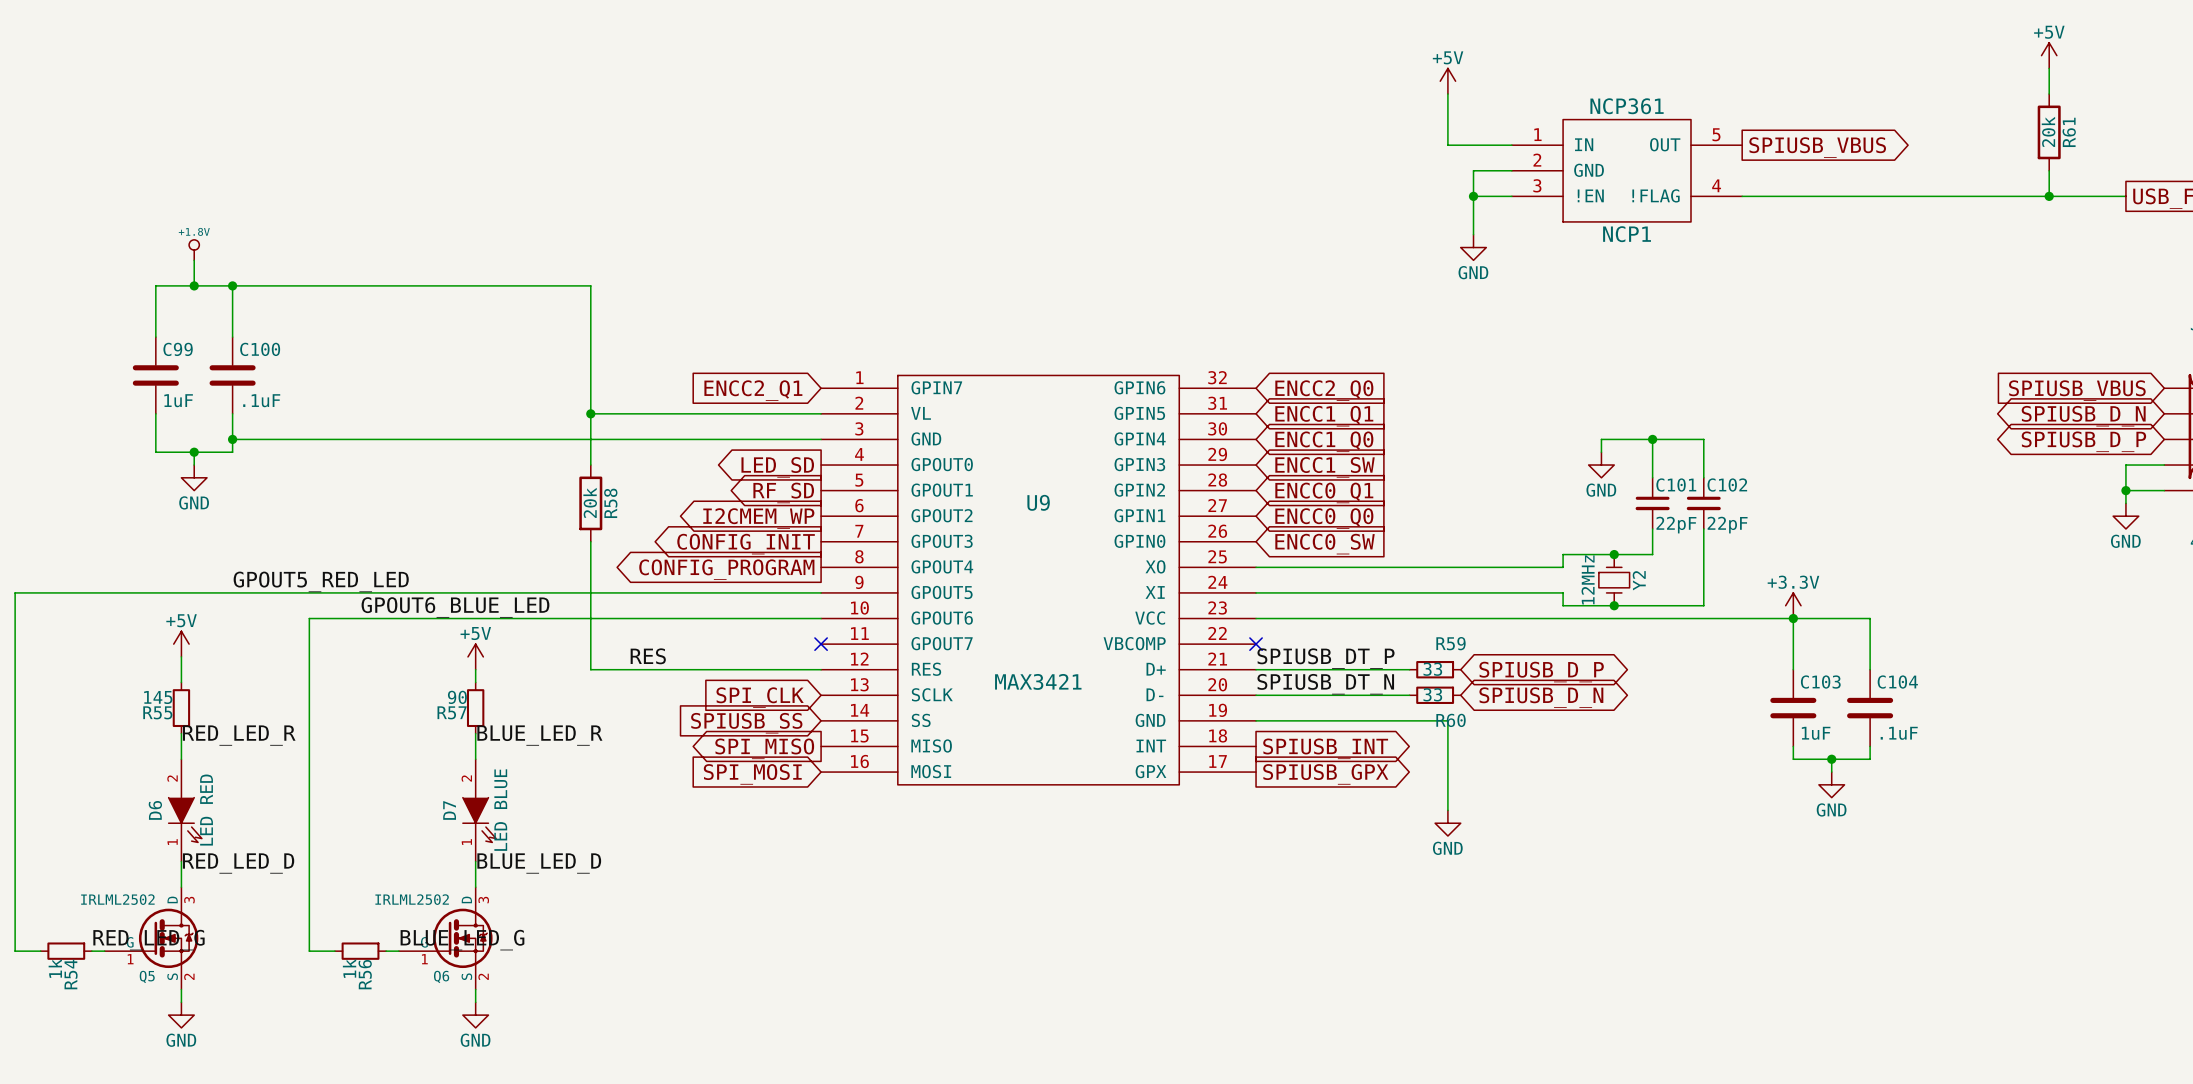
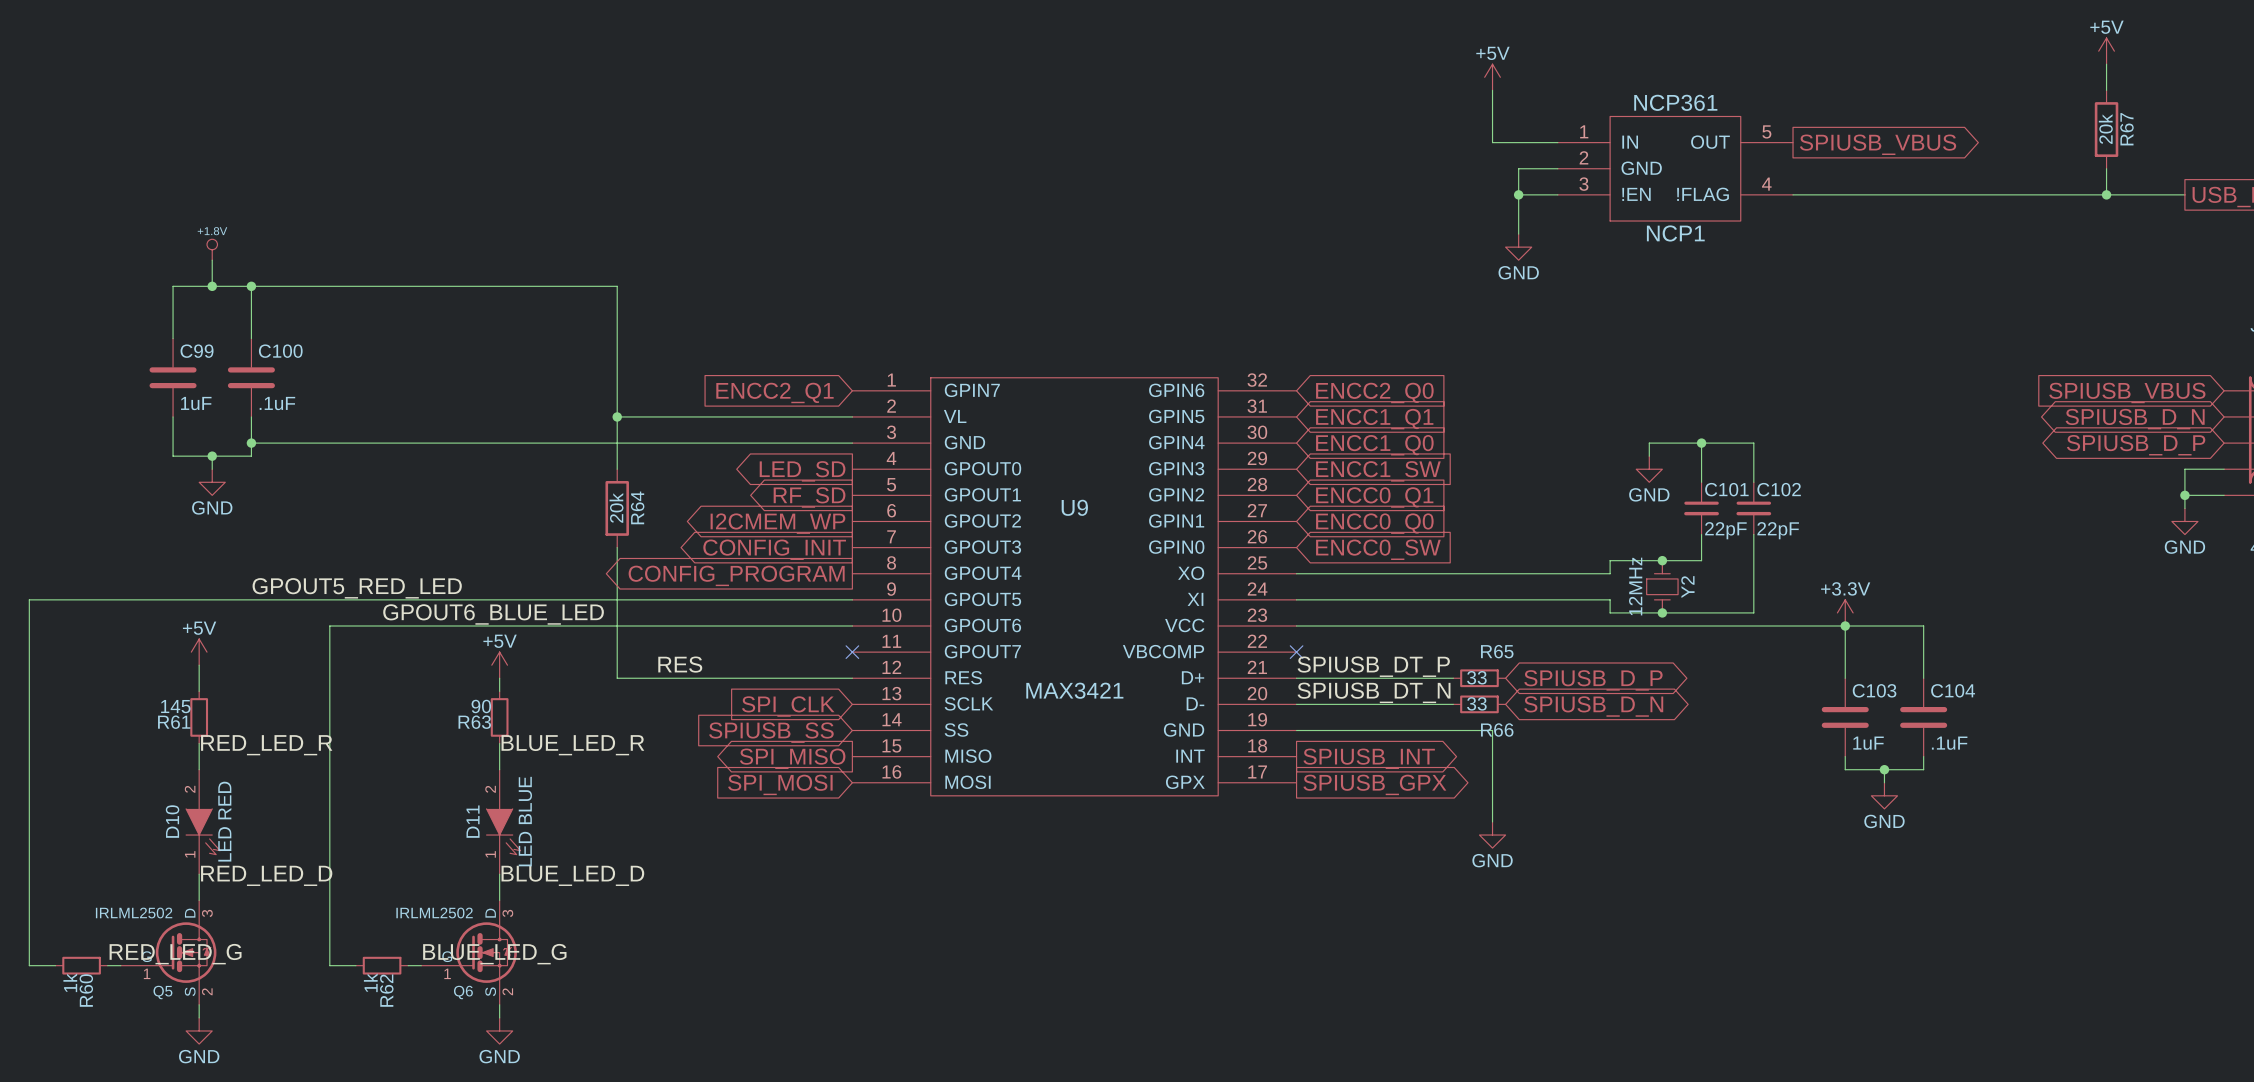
R61 name: R61 (2069, 132) -> R67 (2126, 129)
R58 name: R58 (610, 503) -> R64 (637, 507)
R59 name: R59 (1451, 643) -> R65 (1497, 651)
R55 name: R55 (157, 712) -> R61 (174, 722)
R57 name: R57 (452, 712) -> R63 (474, 722)
R60 name: R60 (1451, 720) -> R66 (1497, 730)
D6 name: D6 (155, 810) -> D10 (172, 821)
D7 name: D7 (449, 810) -> D11 (473, 821)
R54 name: R54 (71, 974) -> R60 (86, 990)
R56 name: R56 (365, 974) -> R62 (386, 990)

